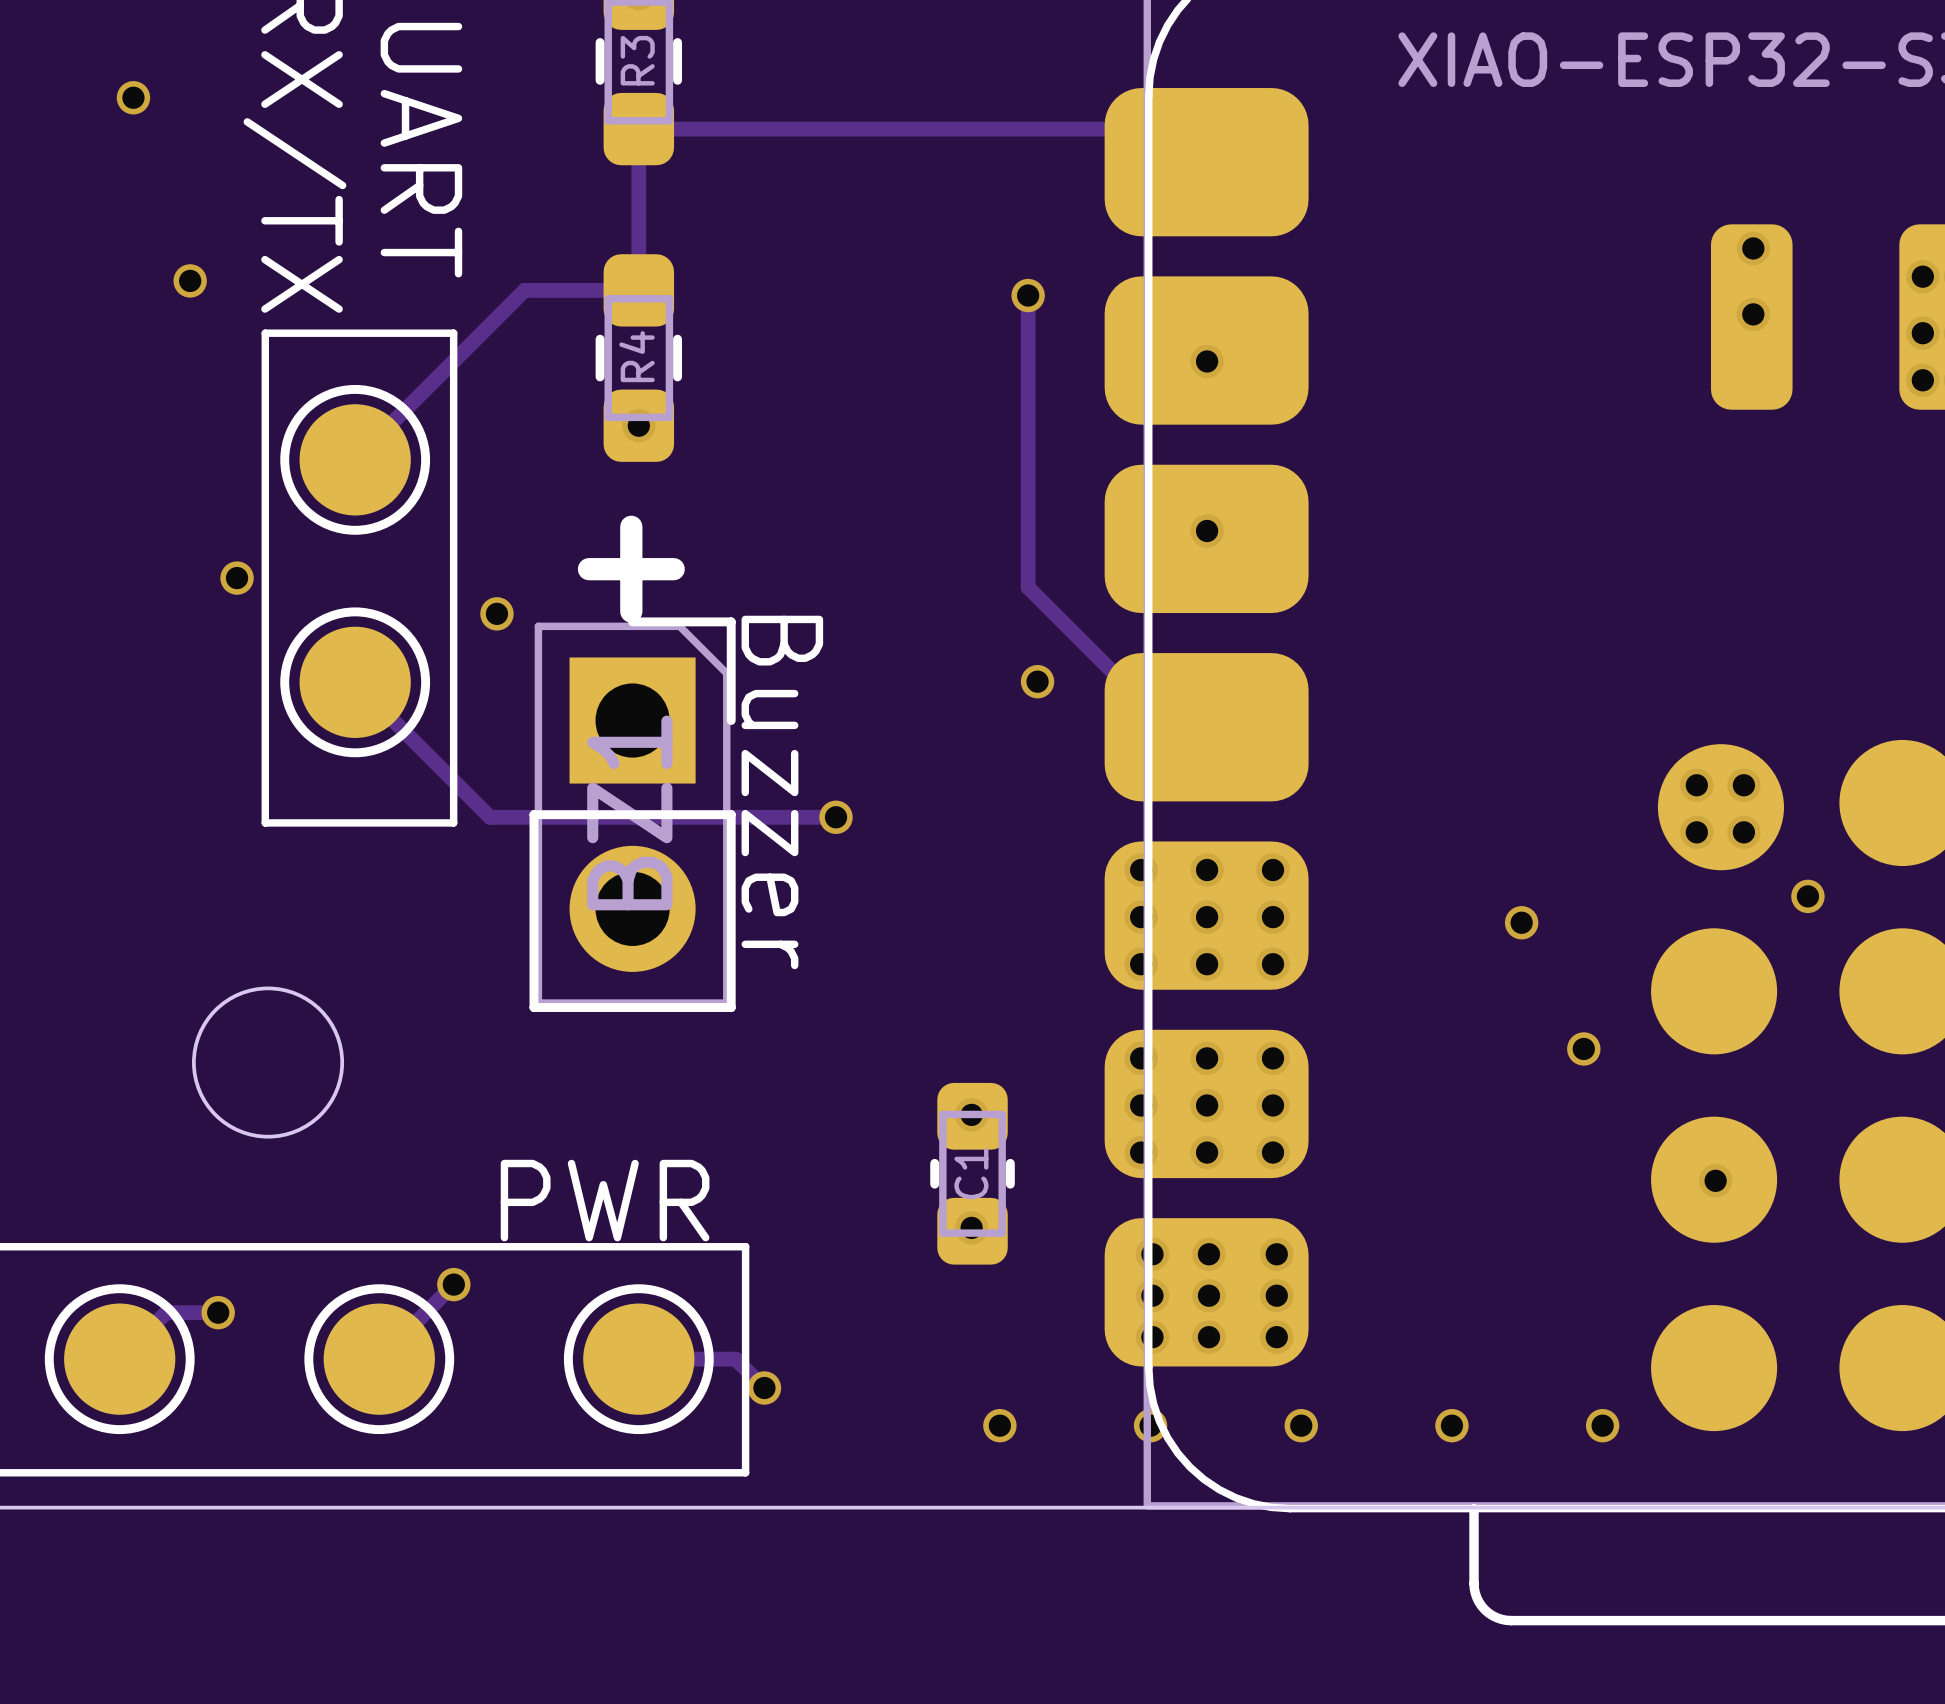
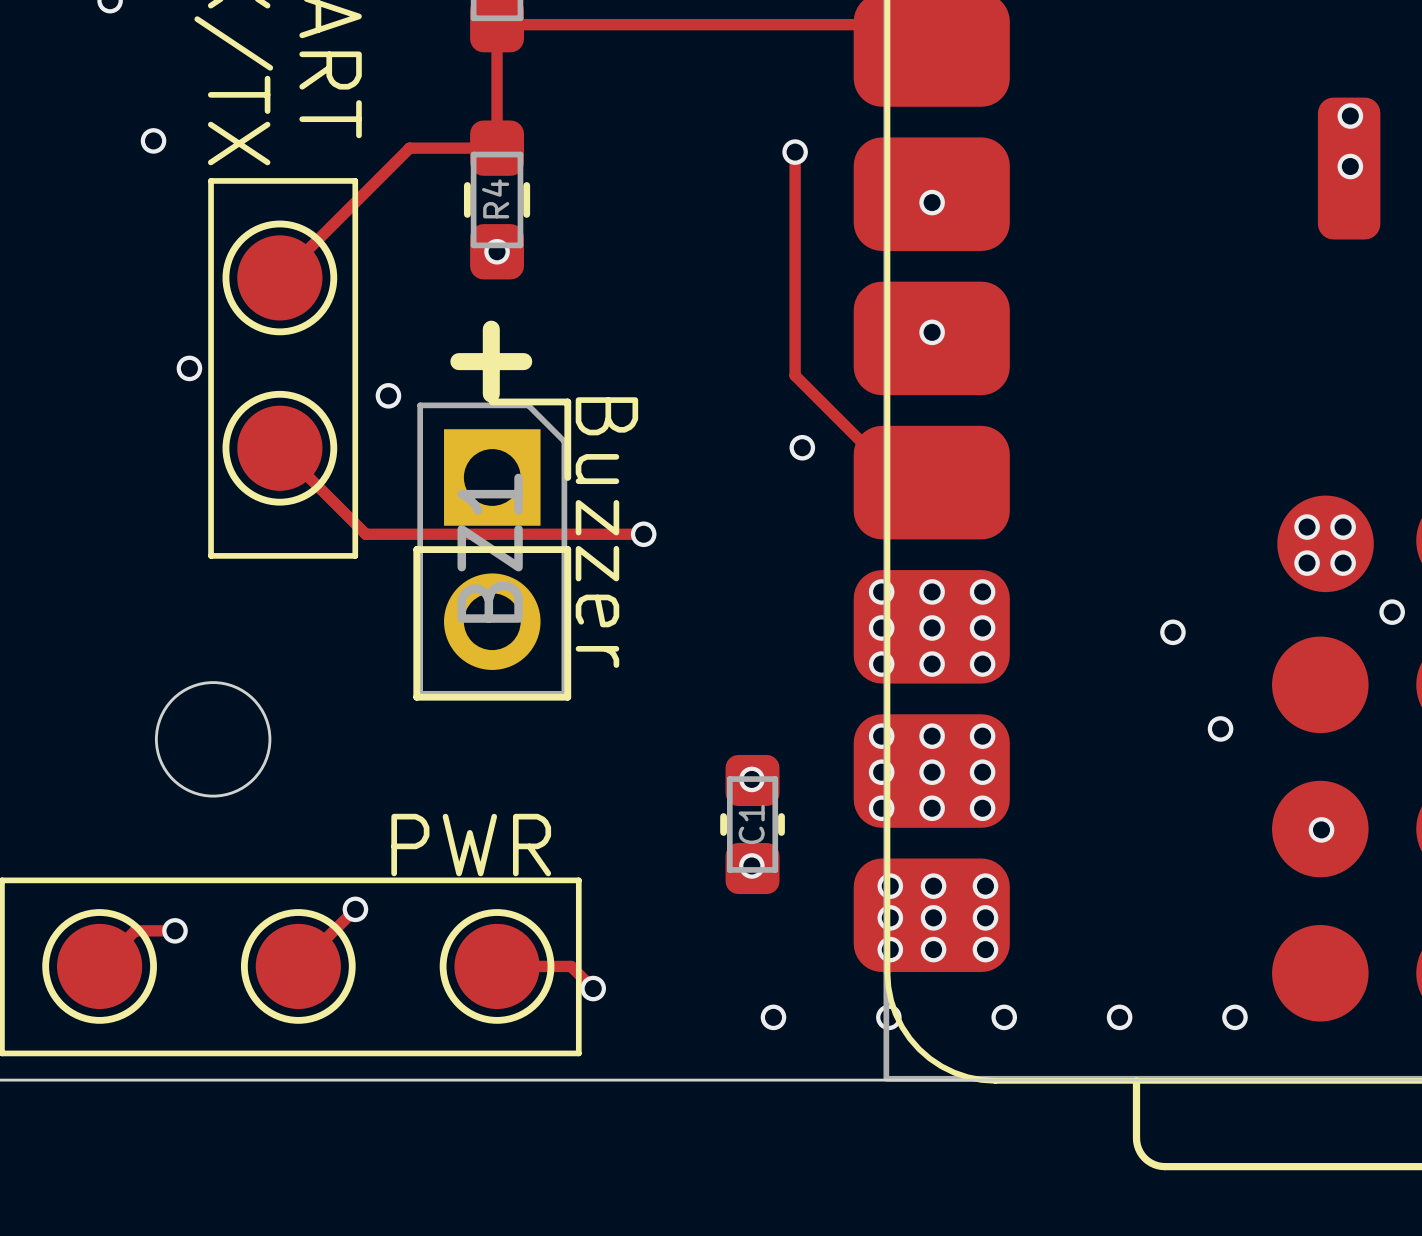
track: (467, 794) (490, 817) (836, 817) -> (365, 534) (643, 534)
via position: (836, 817) -> (643, 534)

